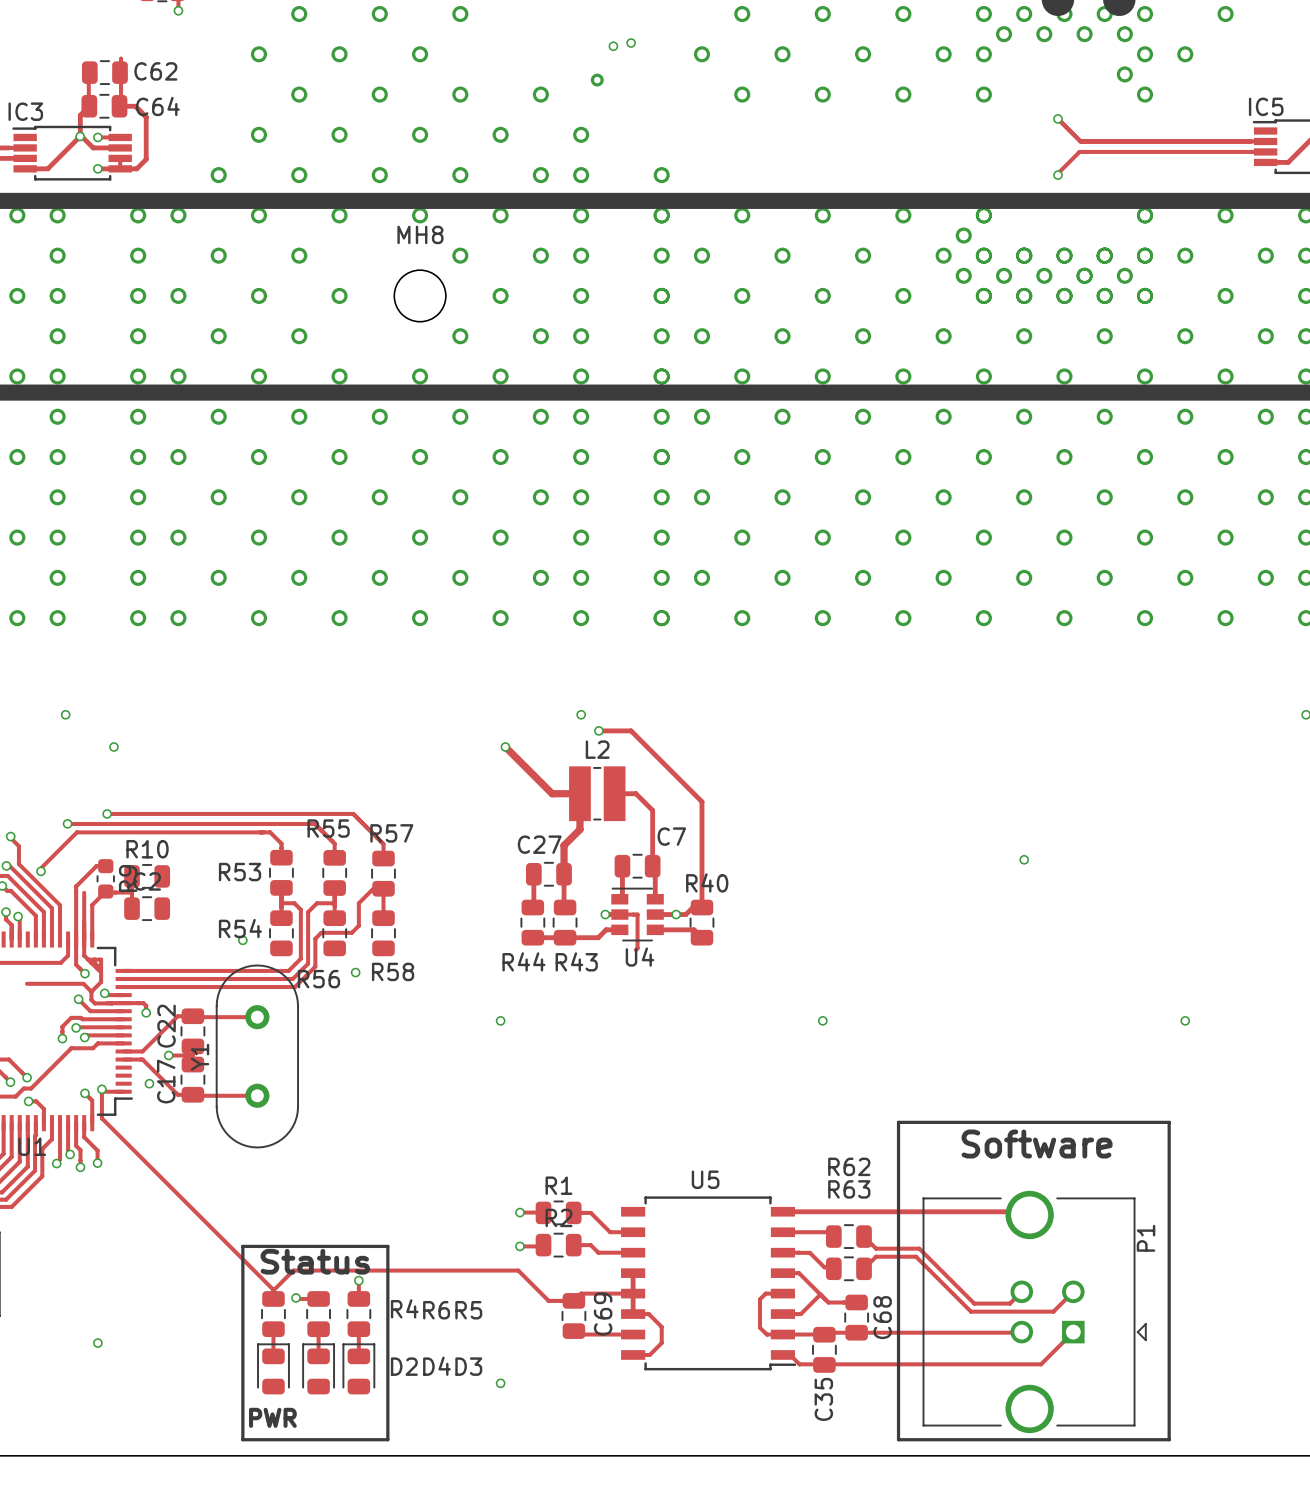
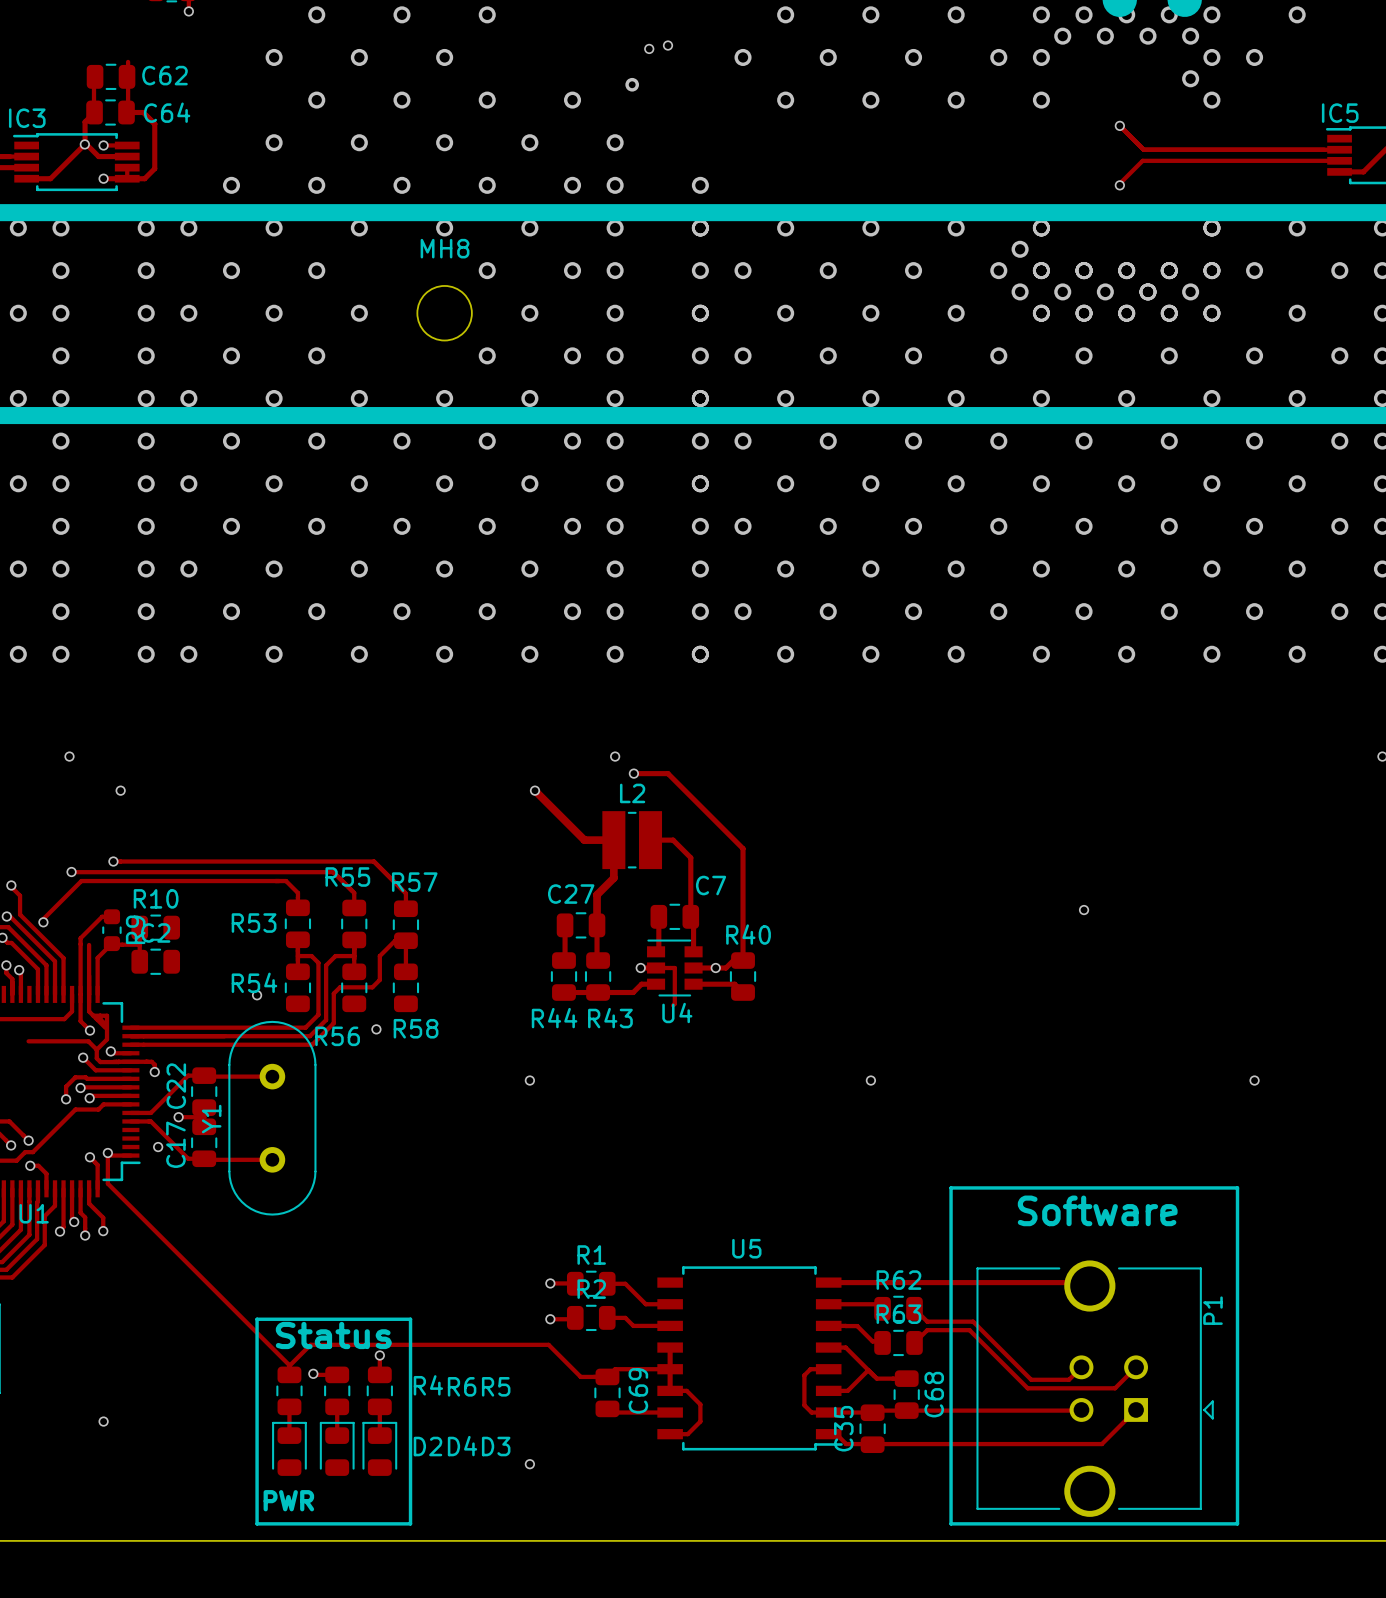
R62 name position: R62 (849, 1166) -> R62 (898, 1280)
R63 name position: R63 (849, 1189) -> R63 (898, 1314)
C35 name position: C35 (823, 1399) -> C35 (843, 1428)

